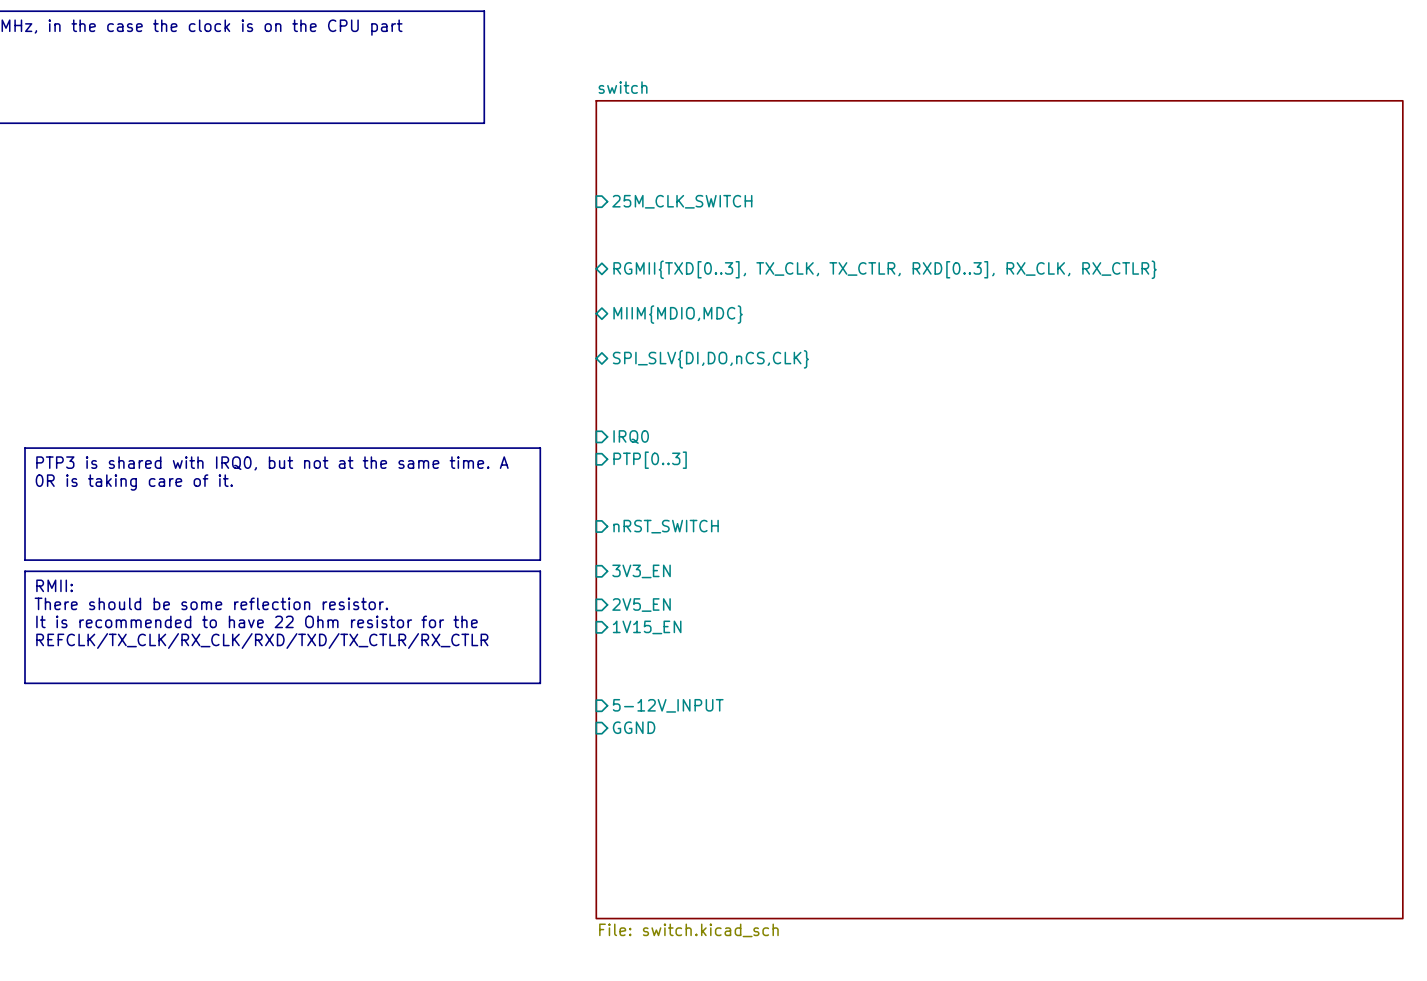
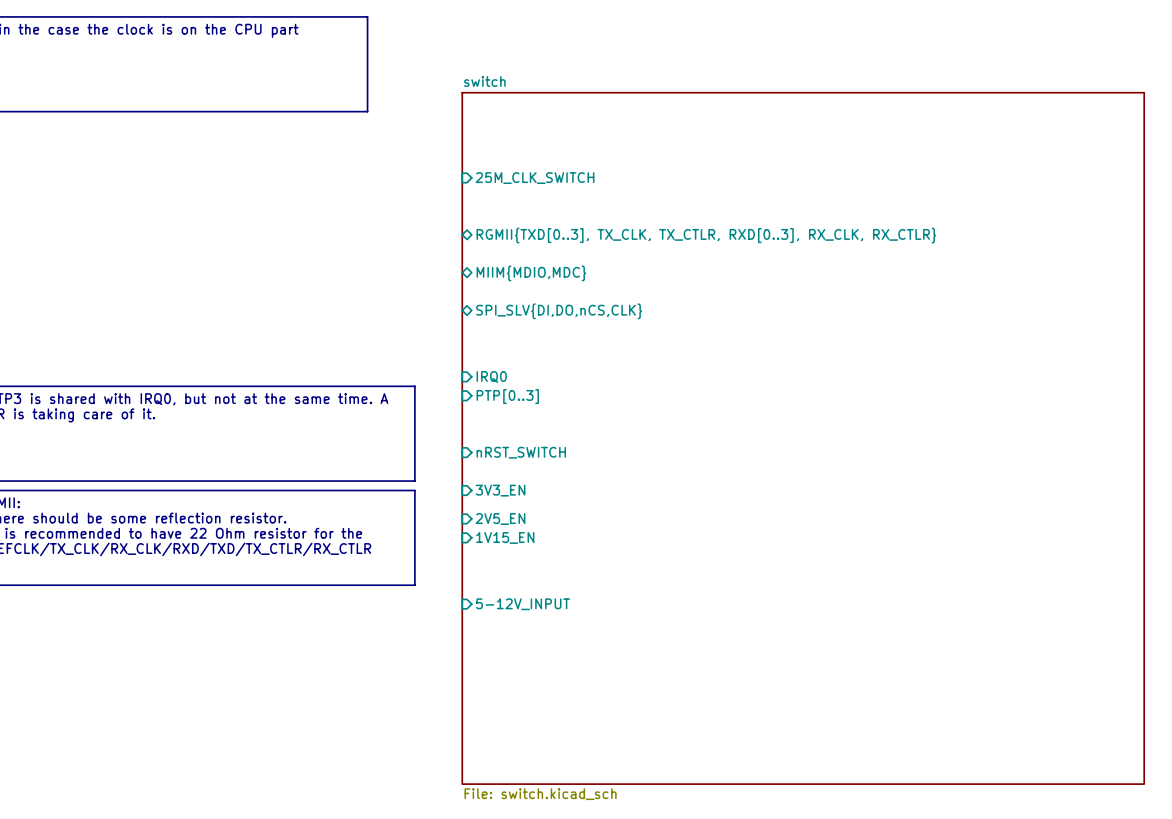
sheet pin: GGND (634, 727) -> none

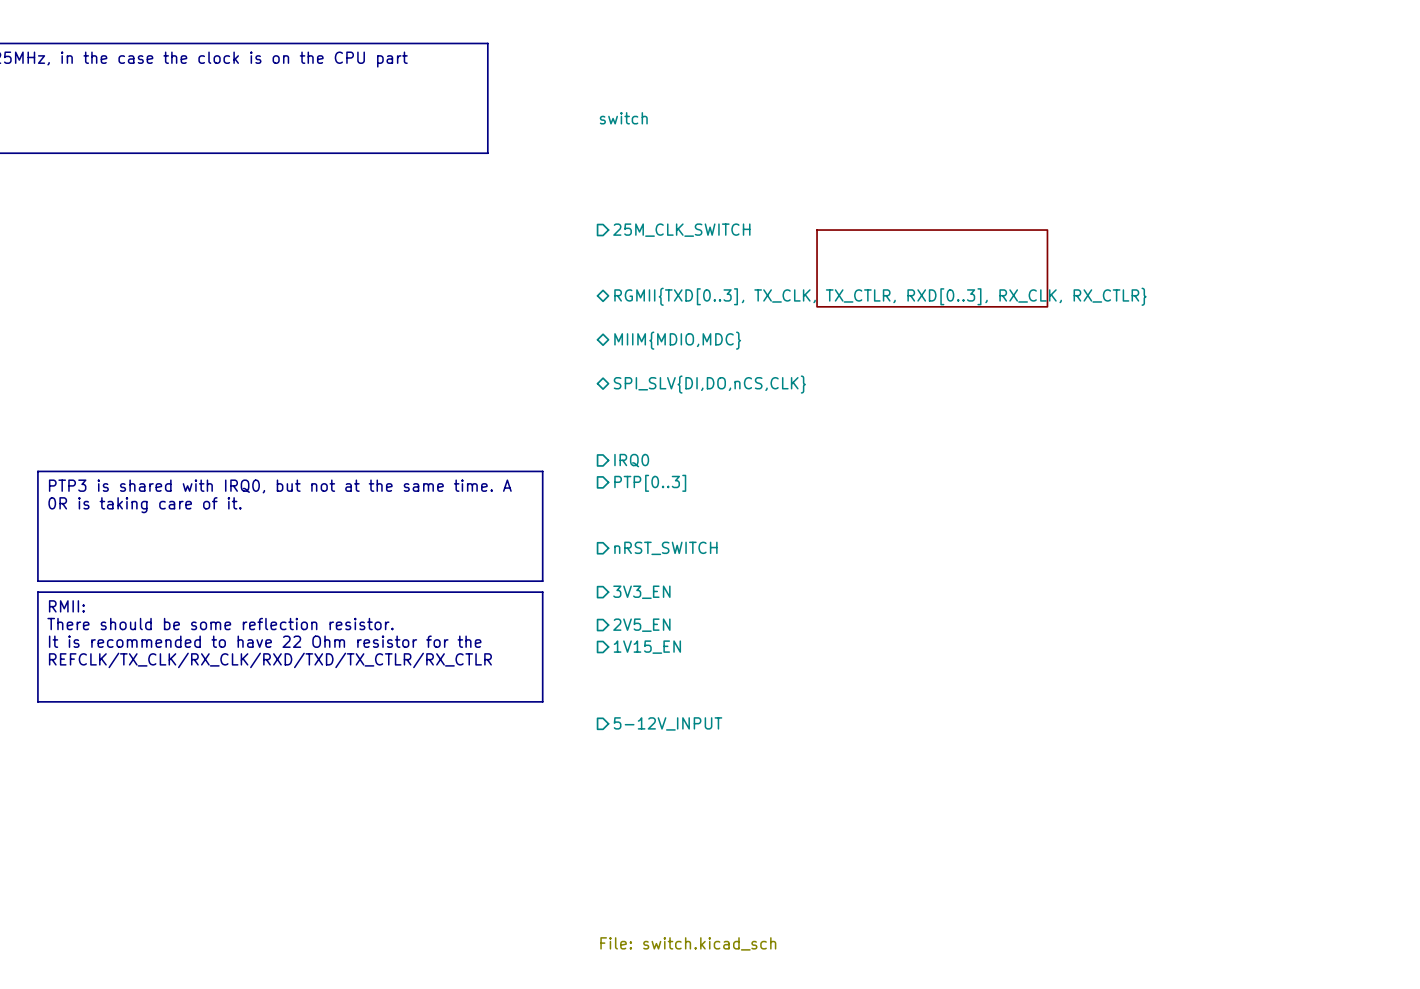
sheet switch: none -> File: switch.kicad_sch (932, 268)
sheet switch: File: switch.kicad_sch (803, 438) -> none

